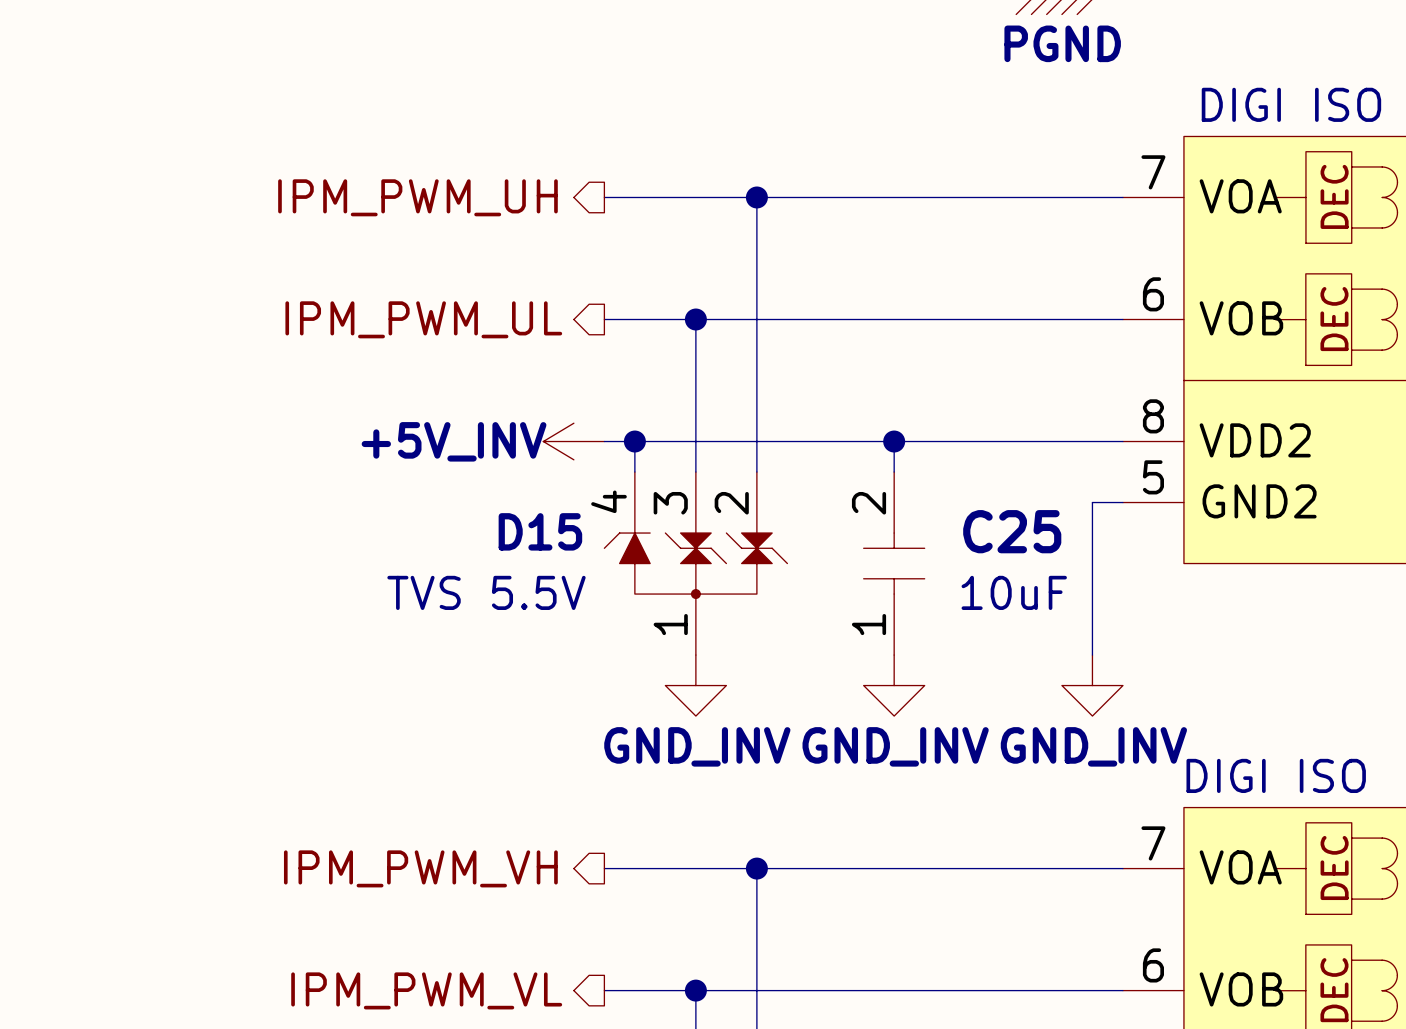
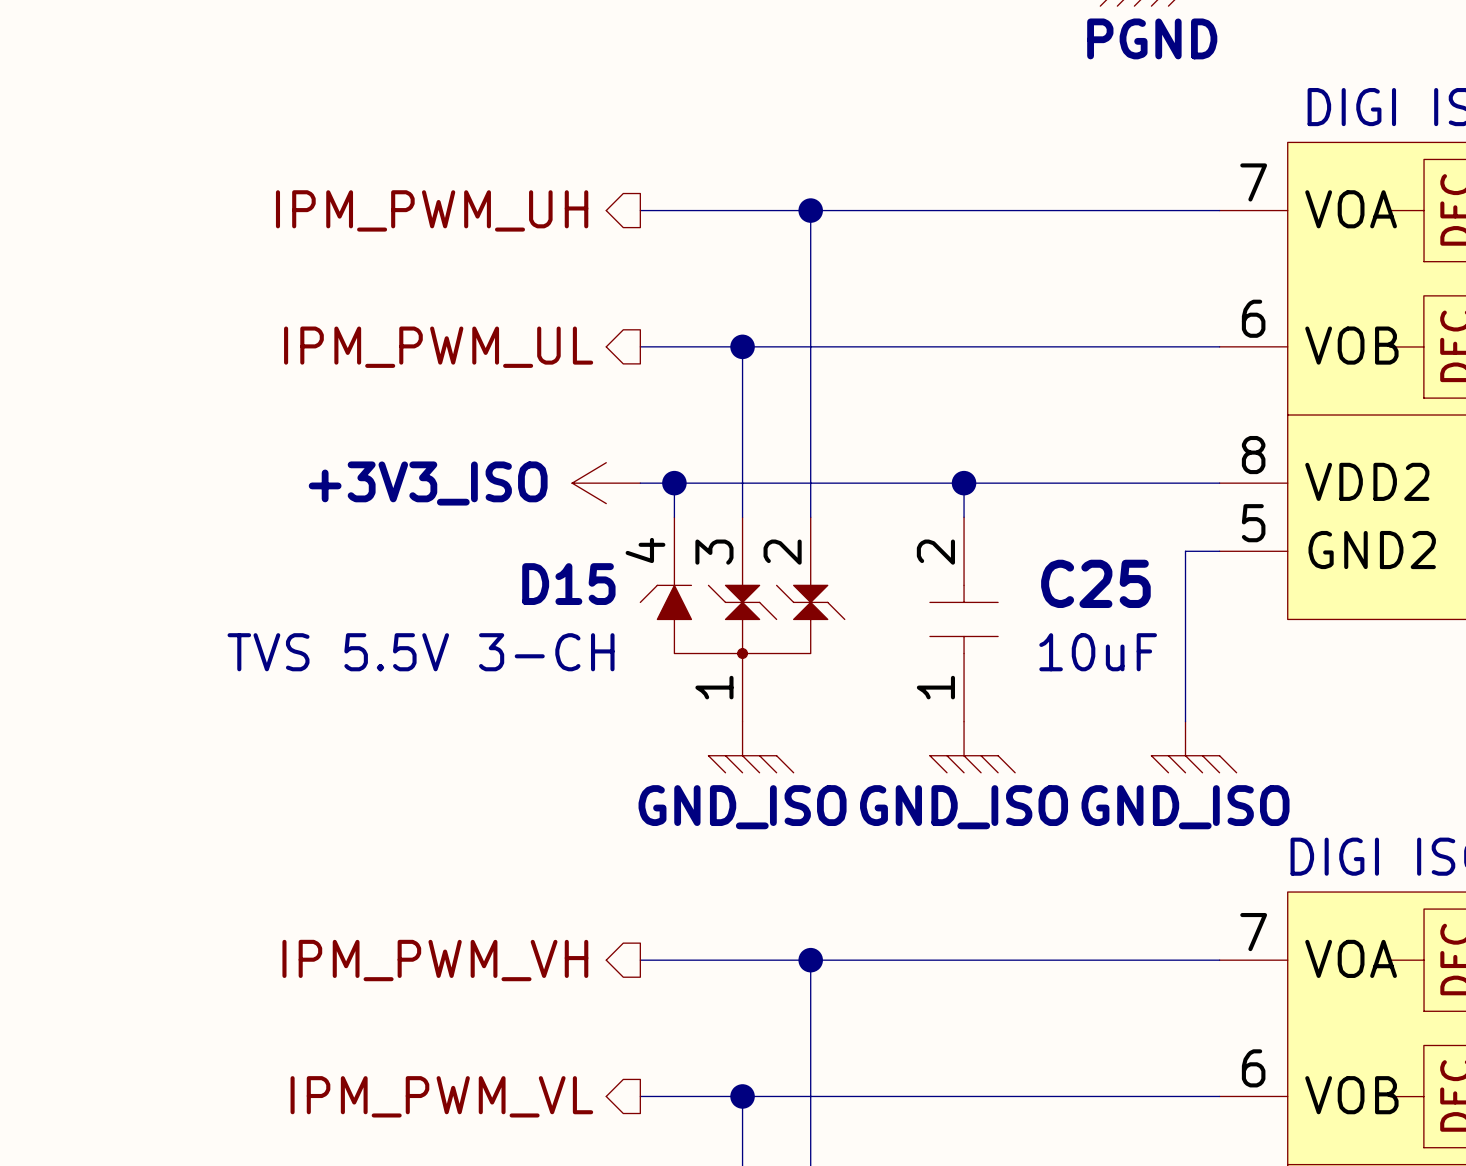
power symbol: +5V_INV (573, 441) -> +3V3_ISO (606, 483)
D15 value: TVS 5.5V (486, 592) -> TVS 5.5V 3-CH (421, 652)
power symbol: GND_INV (695, 685) -> GND_ISO (751, 747)
power symbol: GND_INV (894, 685) -> GND_ISO (972, 747)
power symbol: GND_INV (1092, 685) -> GND_ISO (1194, 747)

